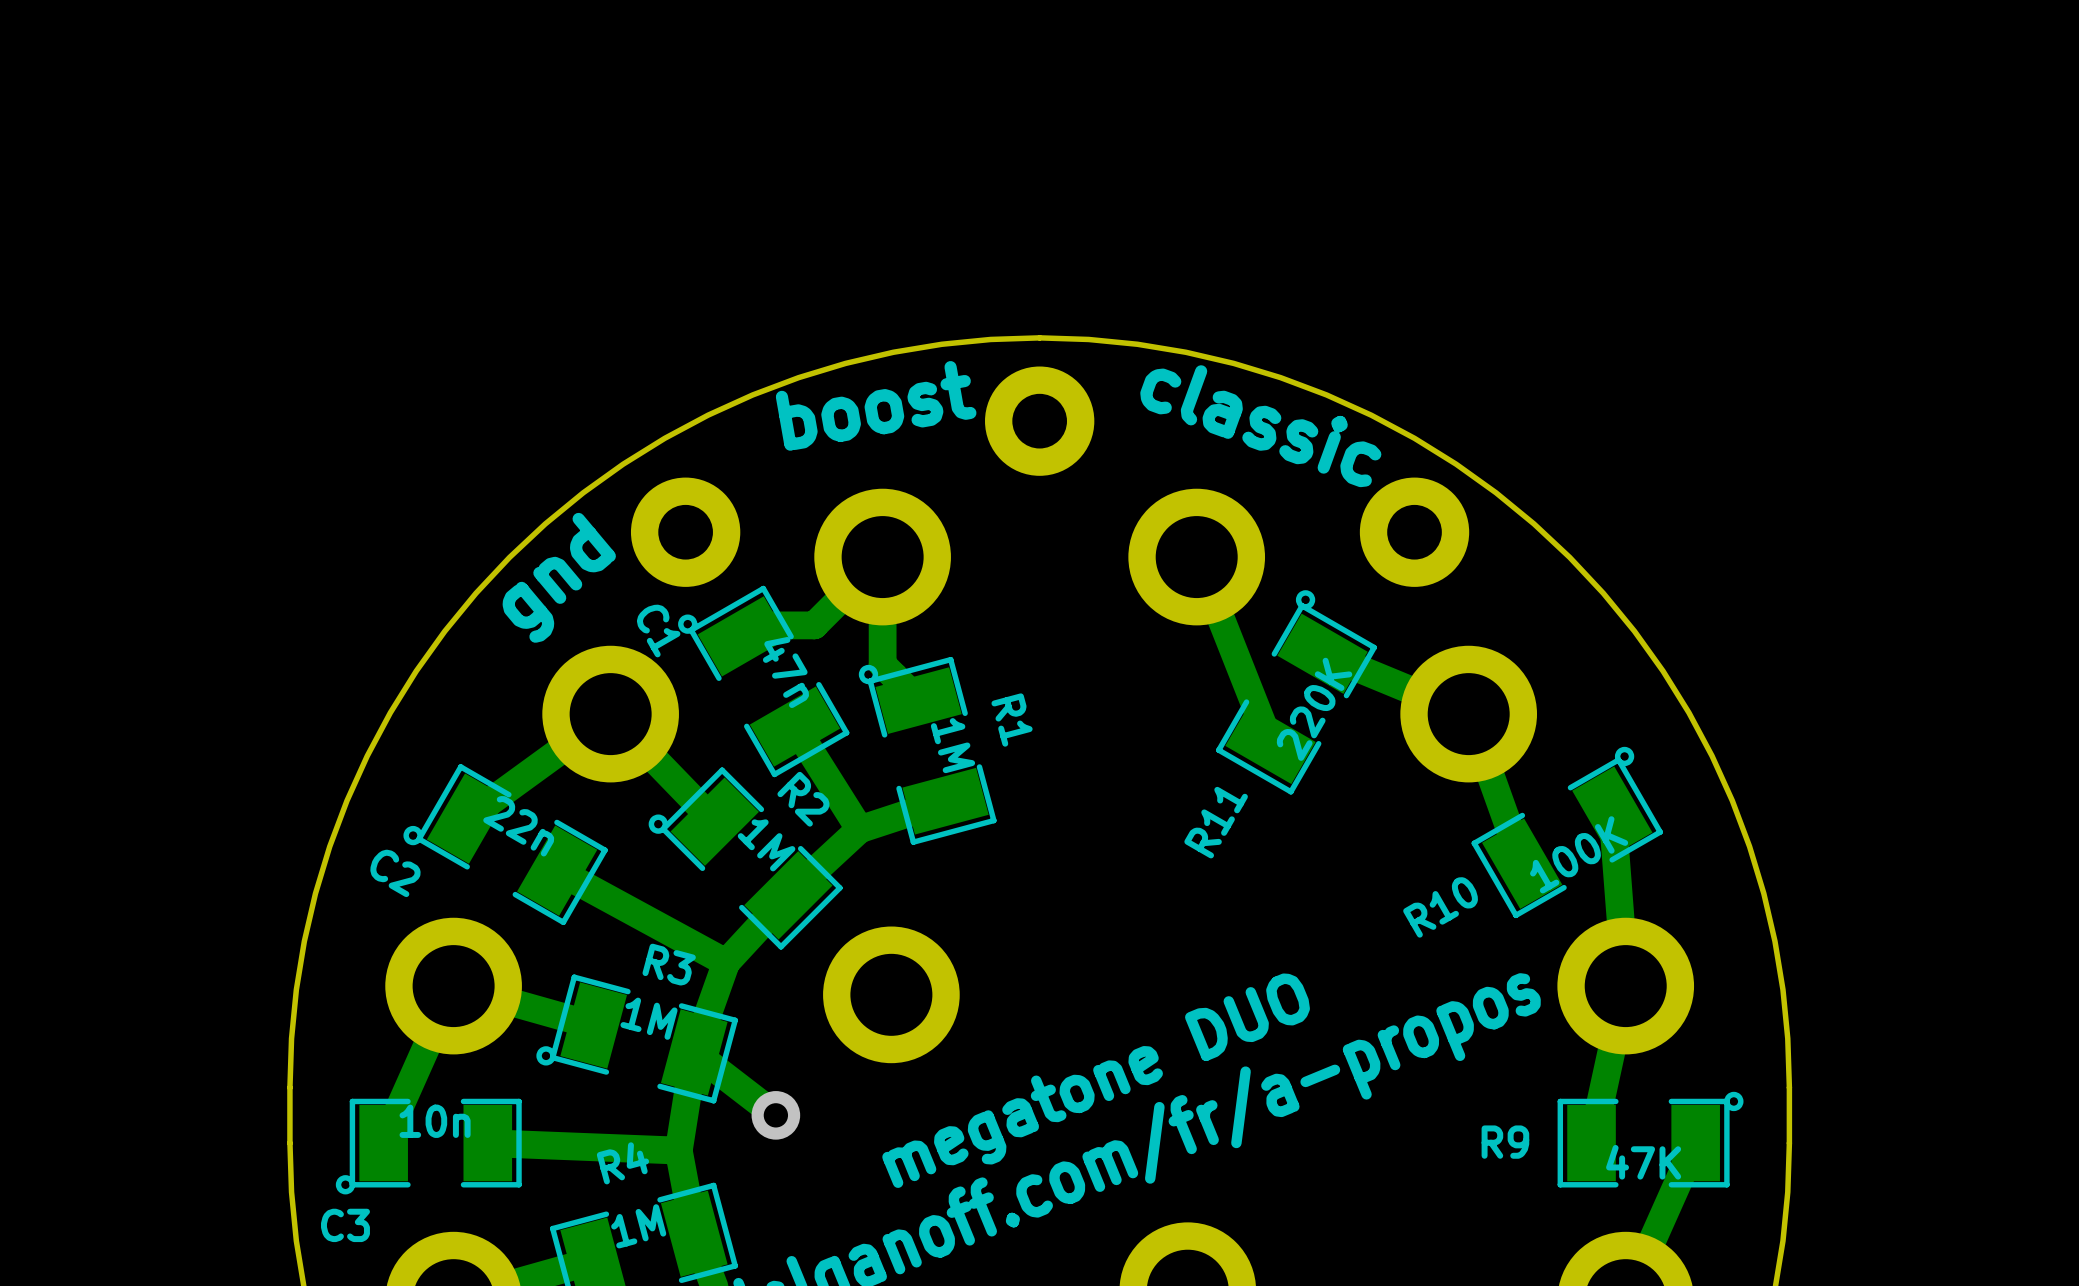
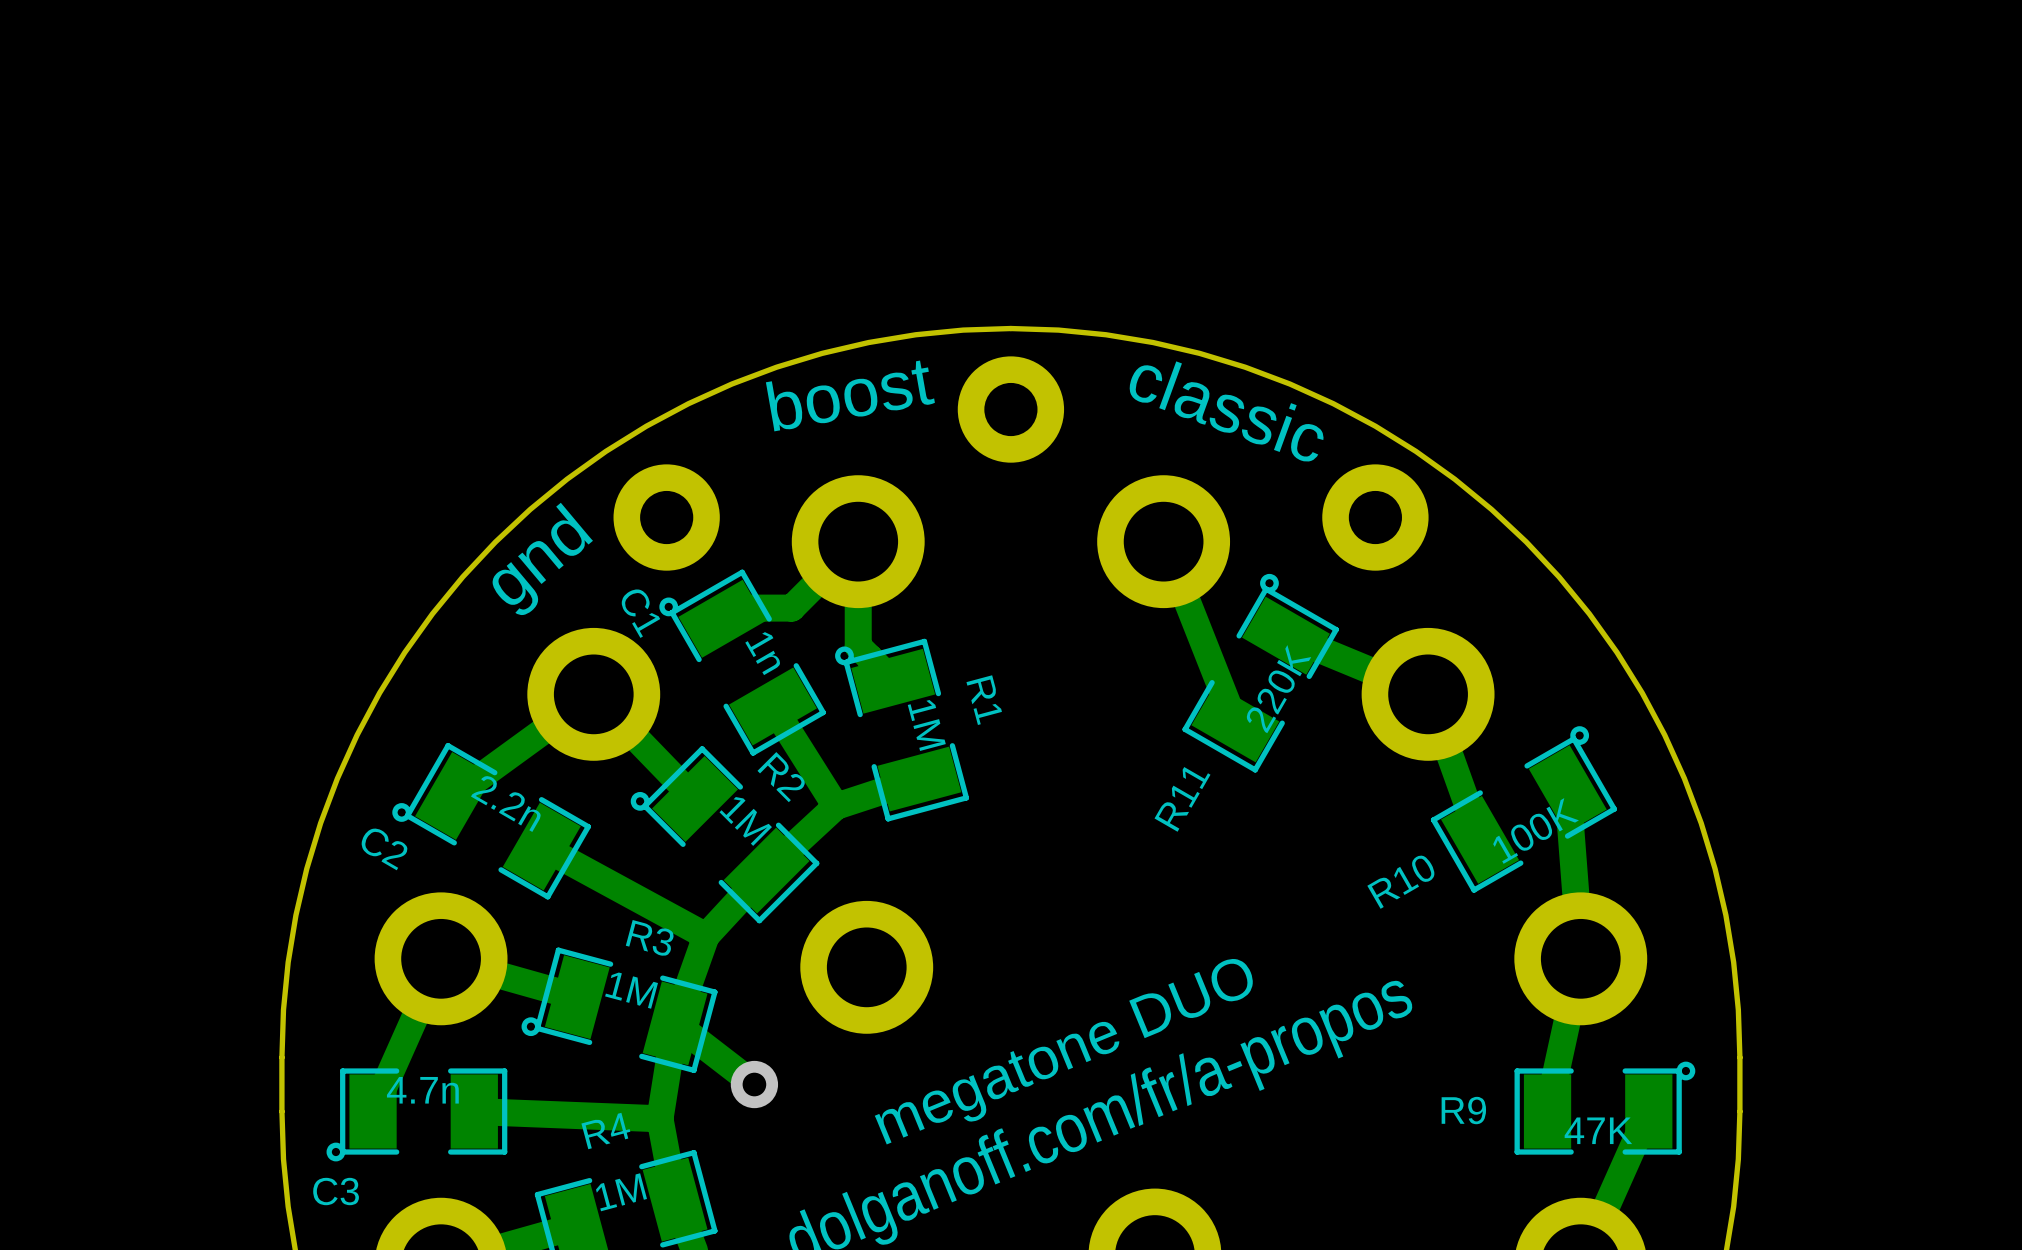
C1 value: 47n (785, 672) -> 1n (762, 653)
C2 value: 22n (518, 826) -> 2.2n (506, 803)
C3 value: 10n (435, 1121) -> 4.7n (422, 1090)

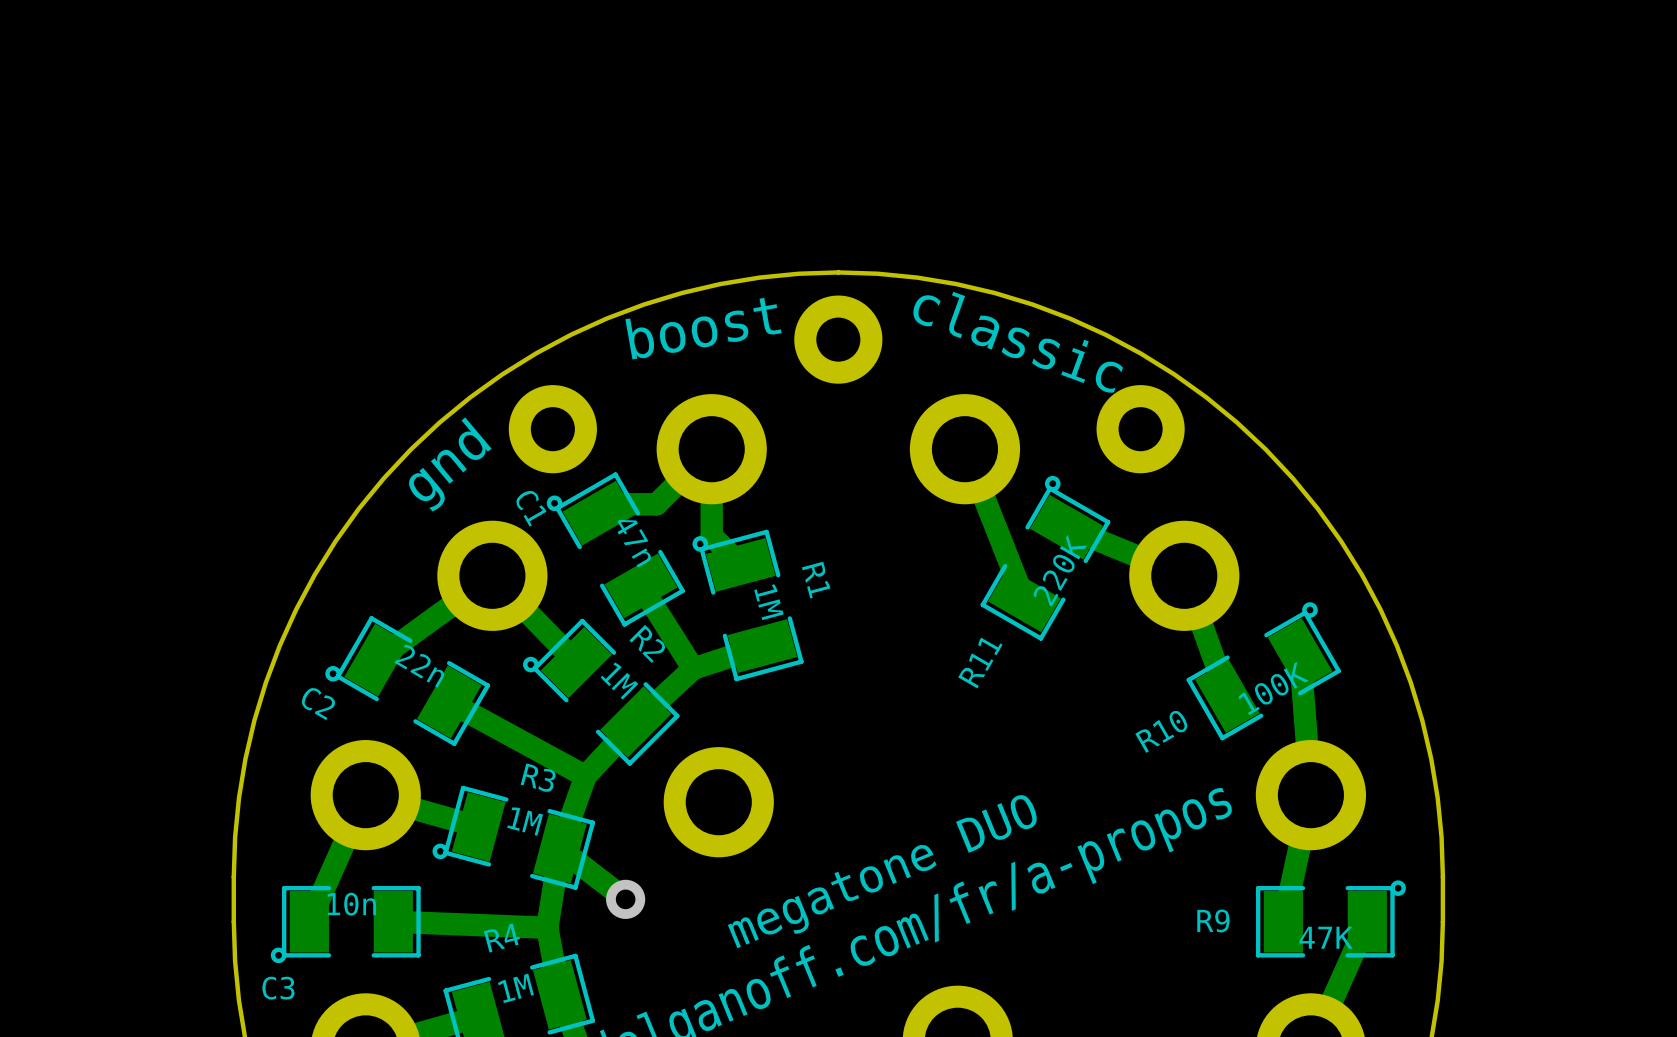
C1 value: 1n (762, 653) -> 47n (634, 543)
C2 value: 2.2n (506, 803) -> 22n (419, 666)
C3 value: 4.7n (422, 1090) -> 10n (351, 904)

